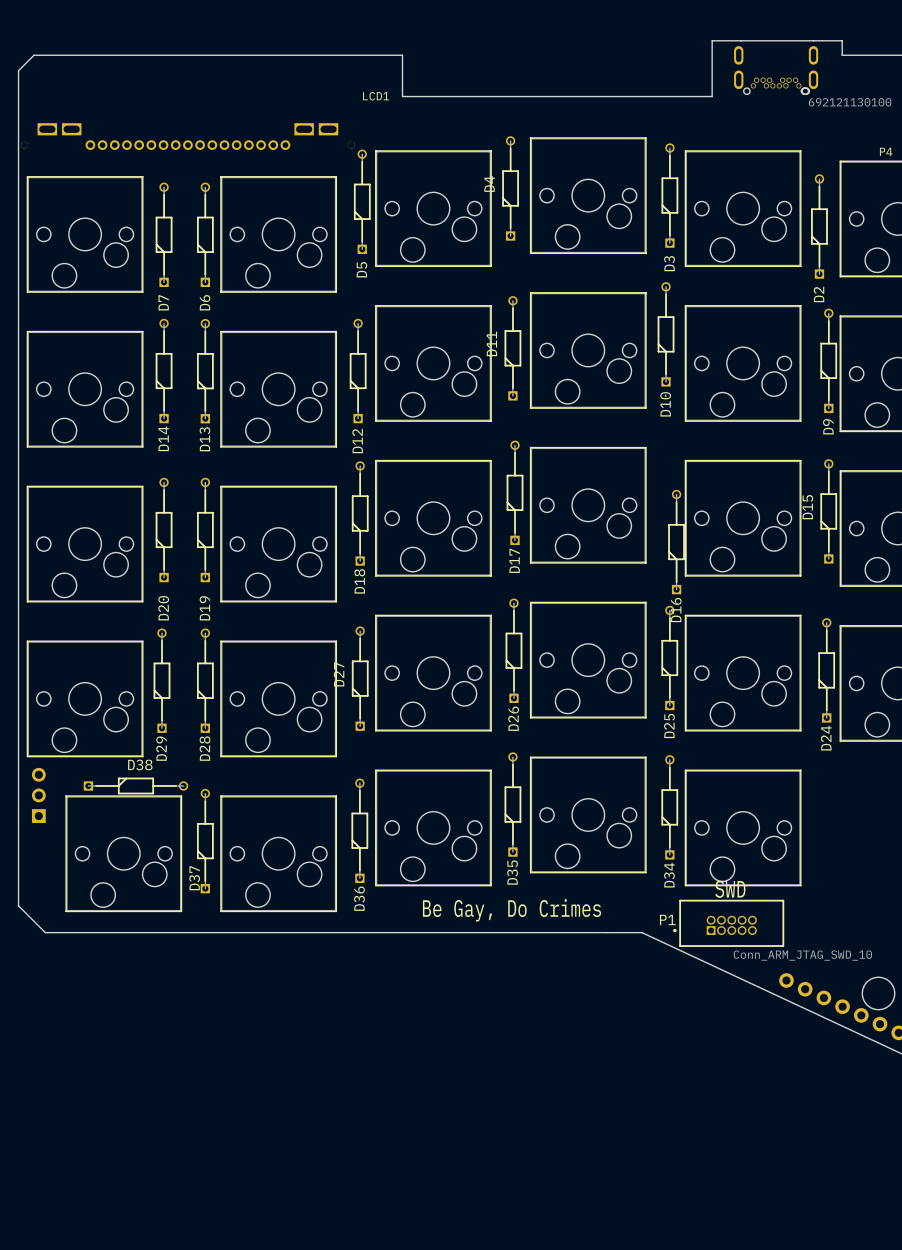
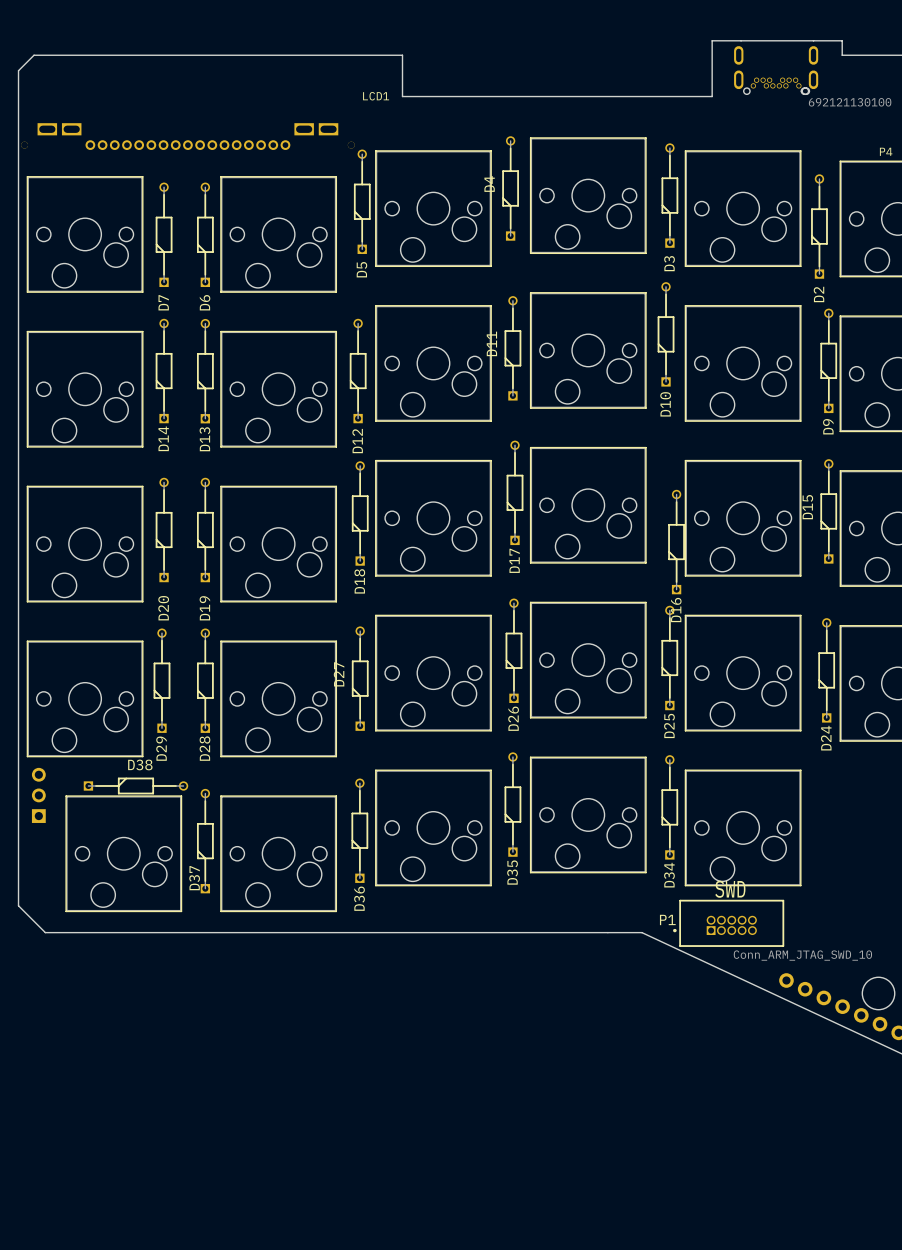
text: Be Gay, Do Crimes (511, 910) -> none

